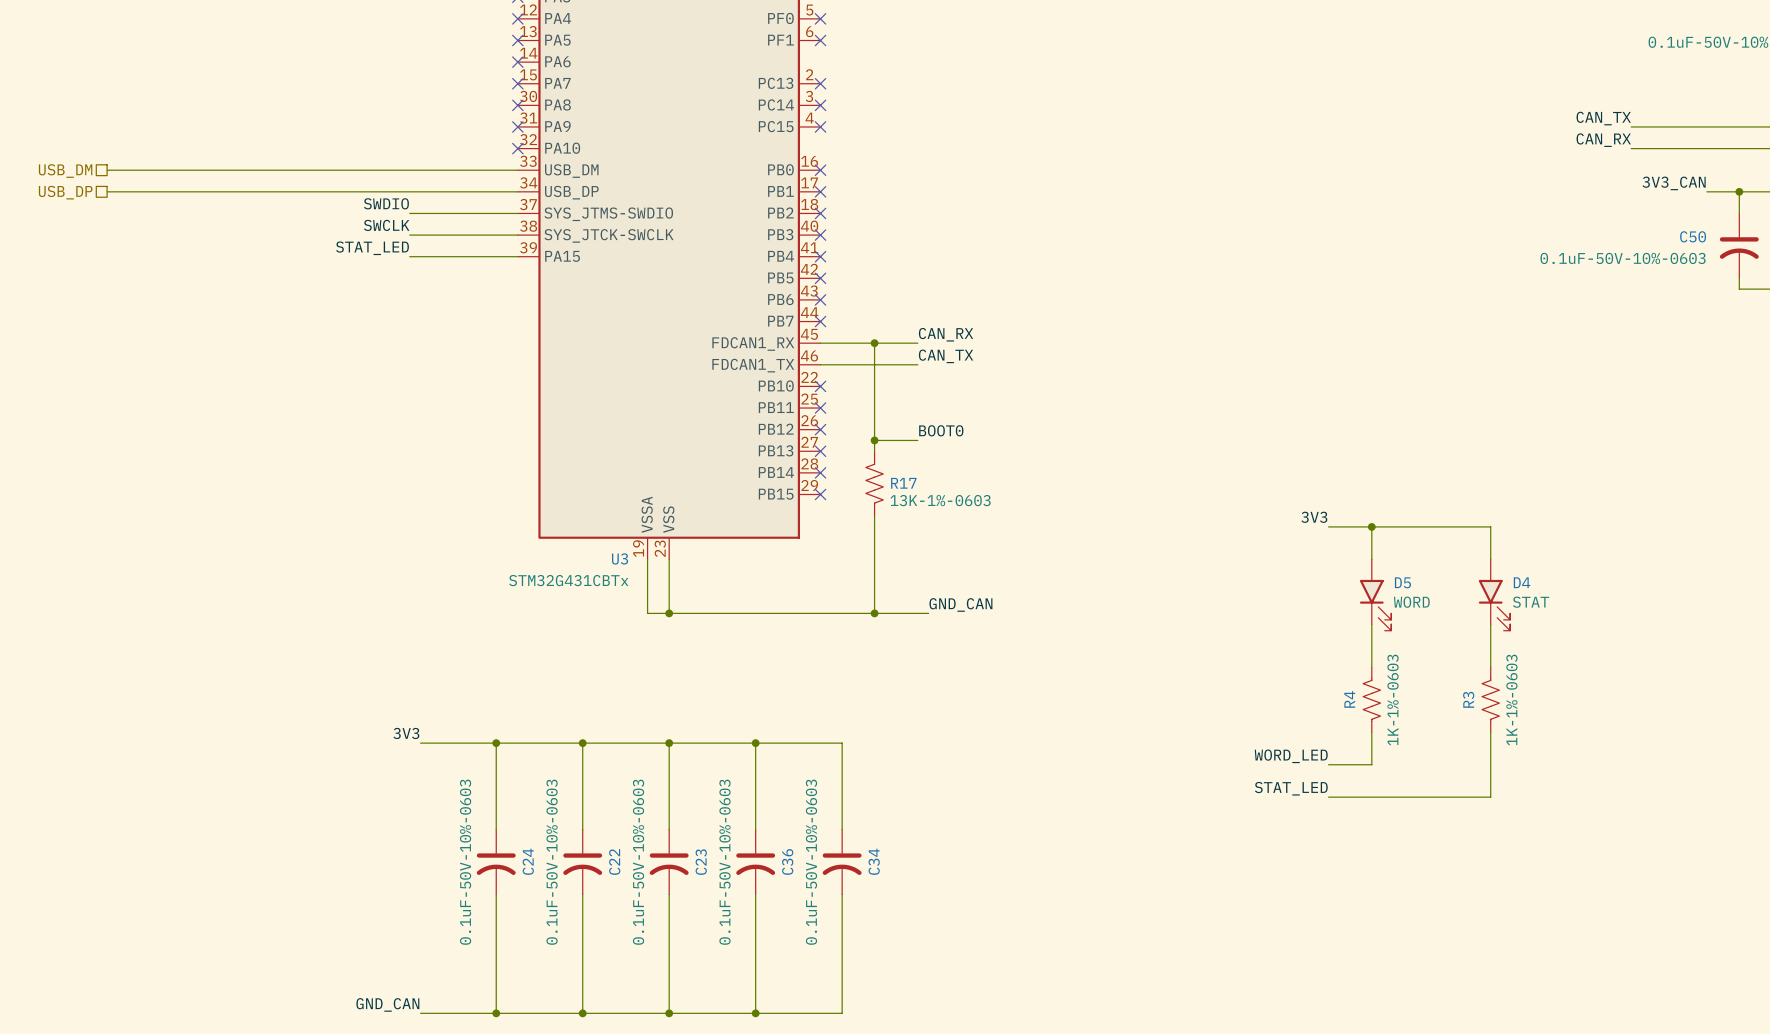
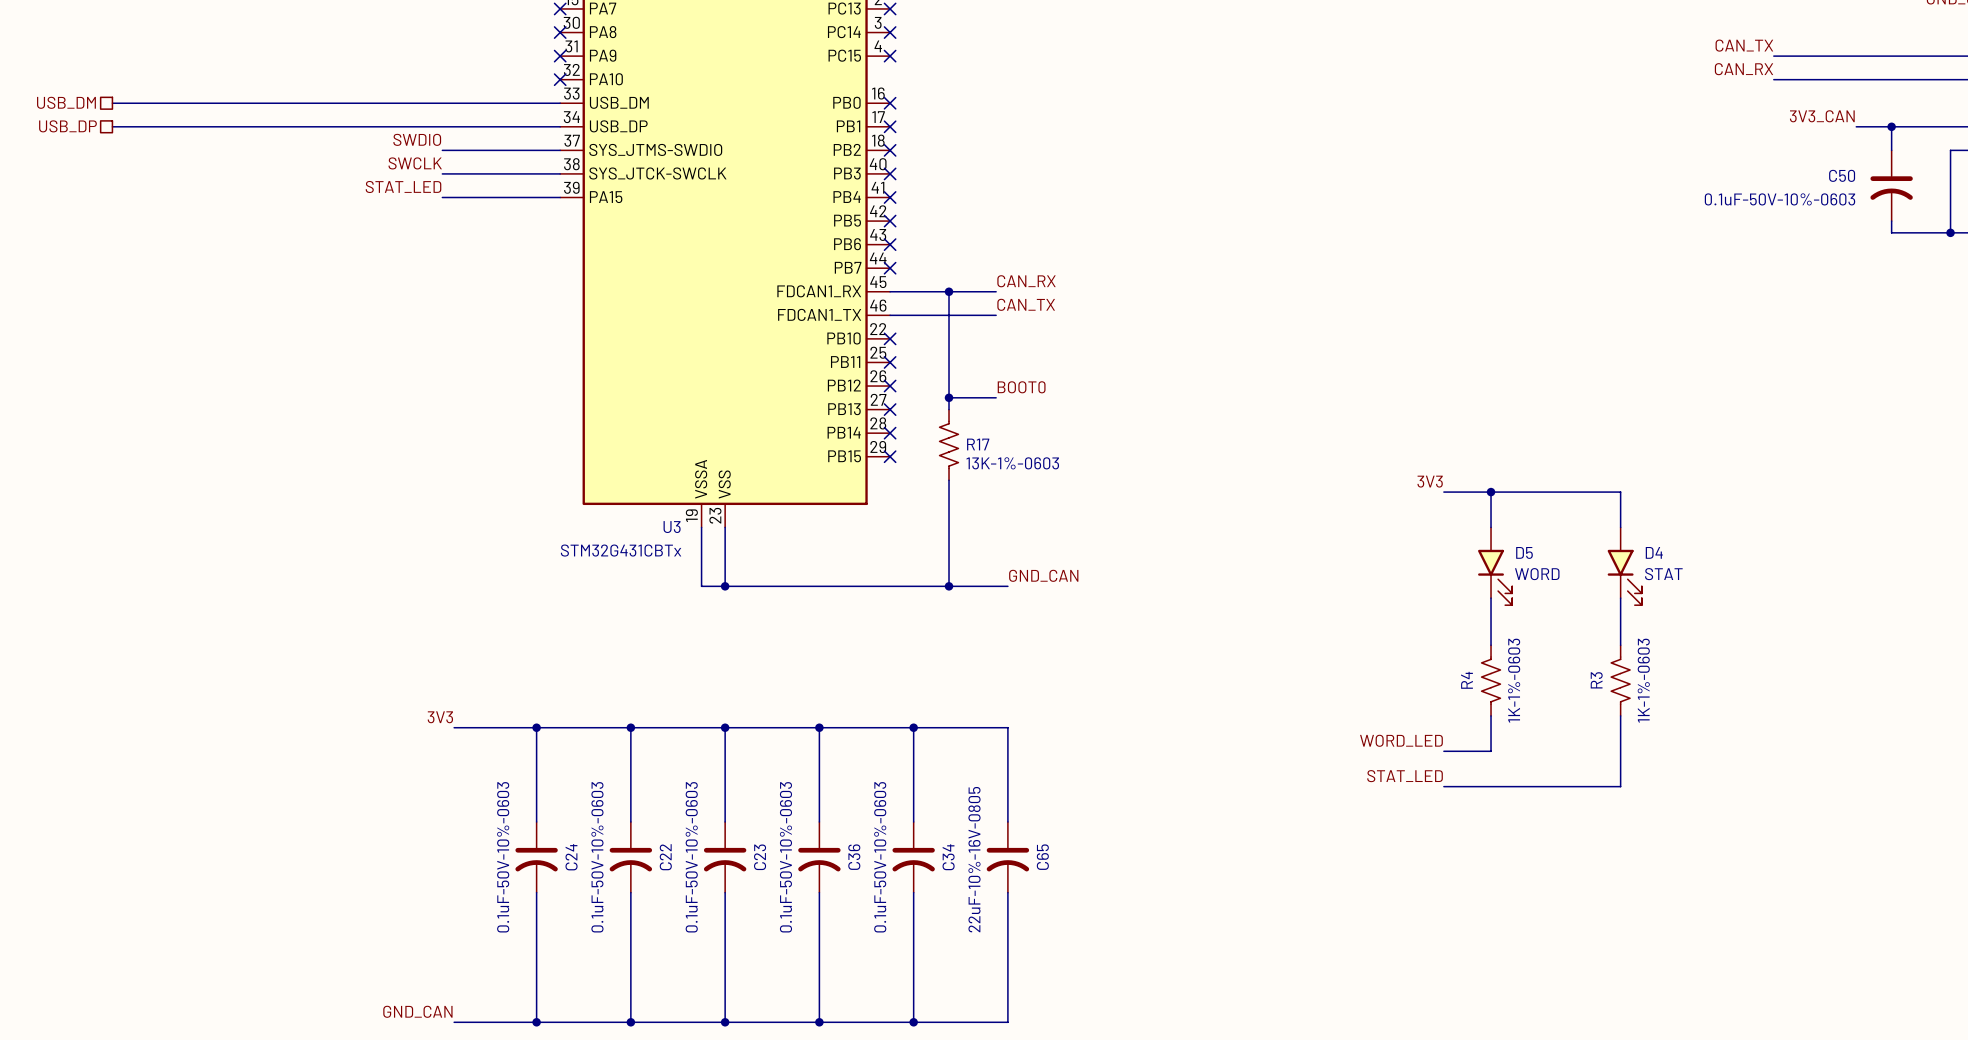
wire: none -> (913, 727) (1007, 727) (1007, 821)
junction: none -> (913, 727)
C65: none -> 22uF-10%-16V-0805 (1007, 857)
wire: none -> (1007, 892) (1007, 1022) (913, 1022)
junction: none -> (913, 1022)

